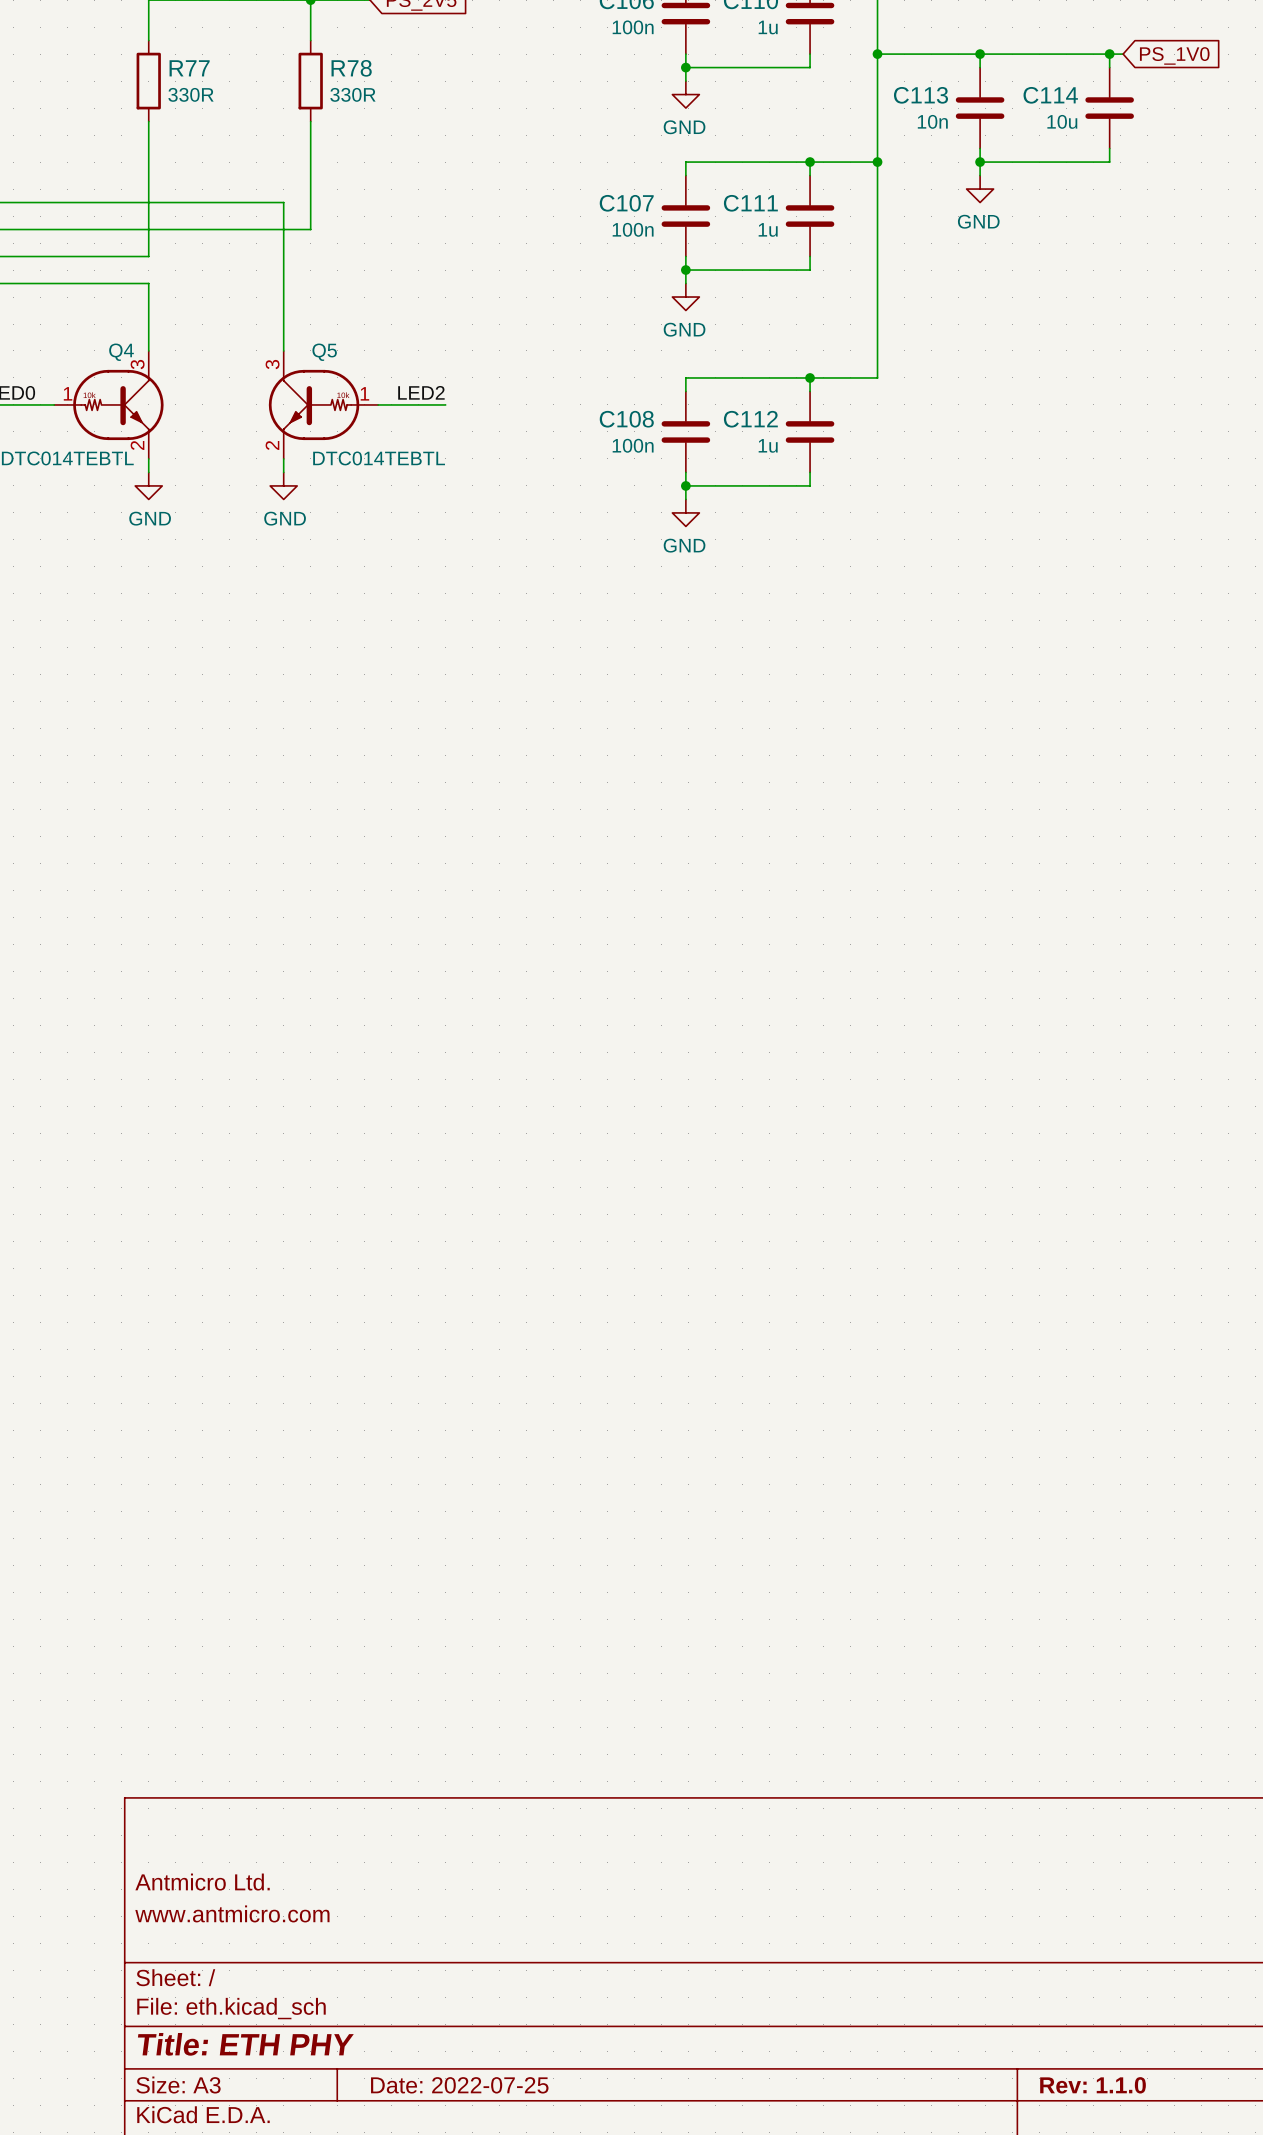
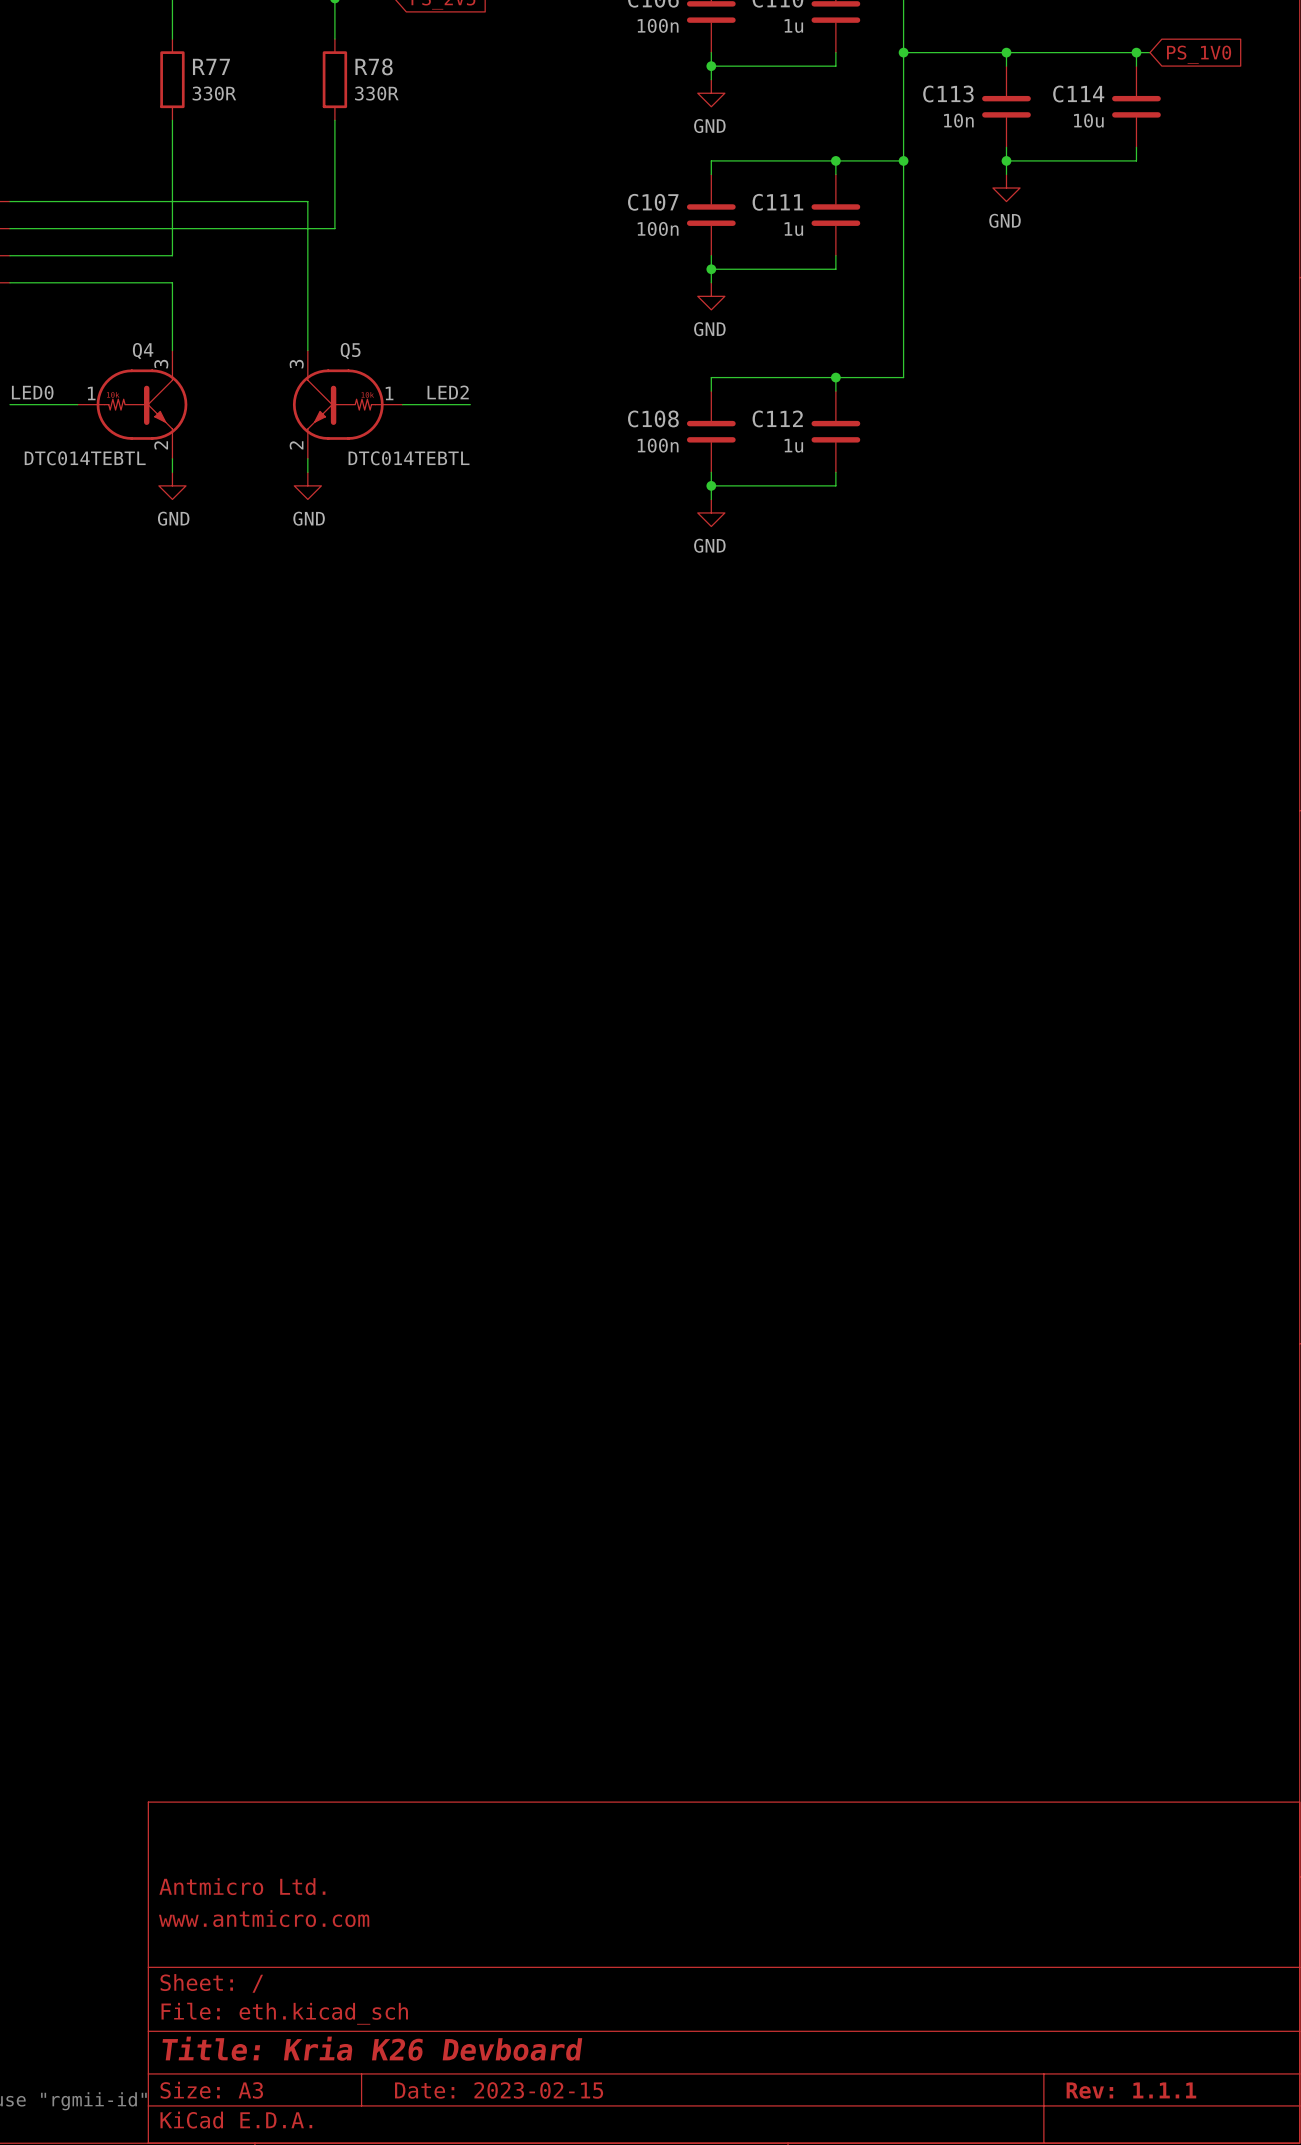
title block: Title: ETH PHY (245, 2044) -> Title: Kria K26 Devboard (372, 2048)
title block: Date: 2022-07-25 (459, 2085) -> Date: 2023-02-15 (499, 2090)
title block: Rev: 1.1.0 (1093, 2085) -> Rev: 1.1.1 (1131, 2090)

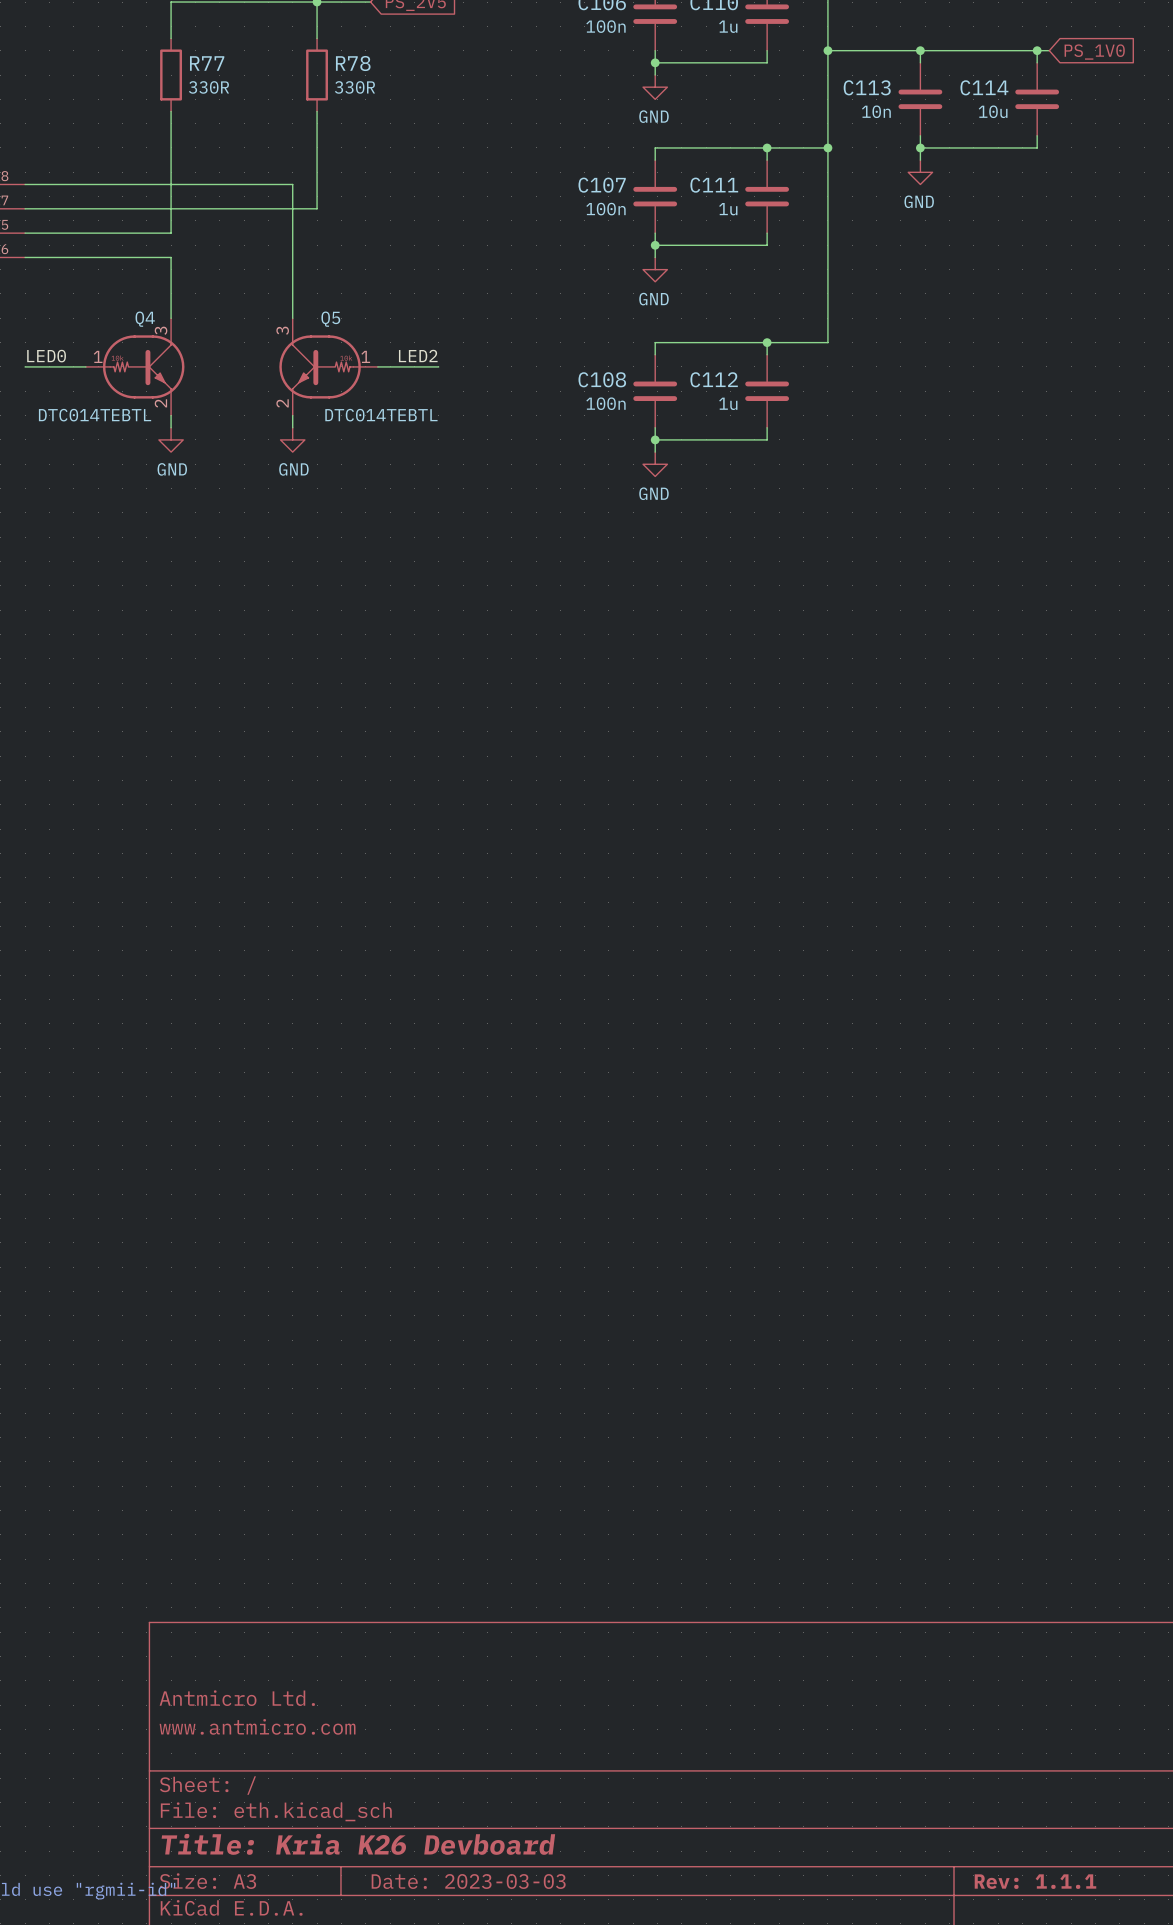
title block: Date: 2023-02-15 (499, 2090) -> Date: 2023-03-03 (468, 1881)

